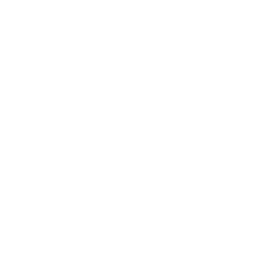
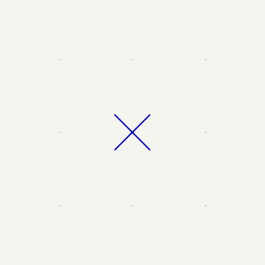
no-connect mark: none -> (132, 132)

